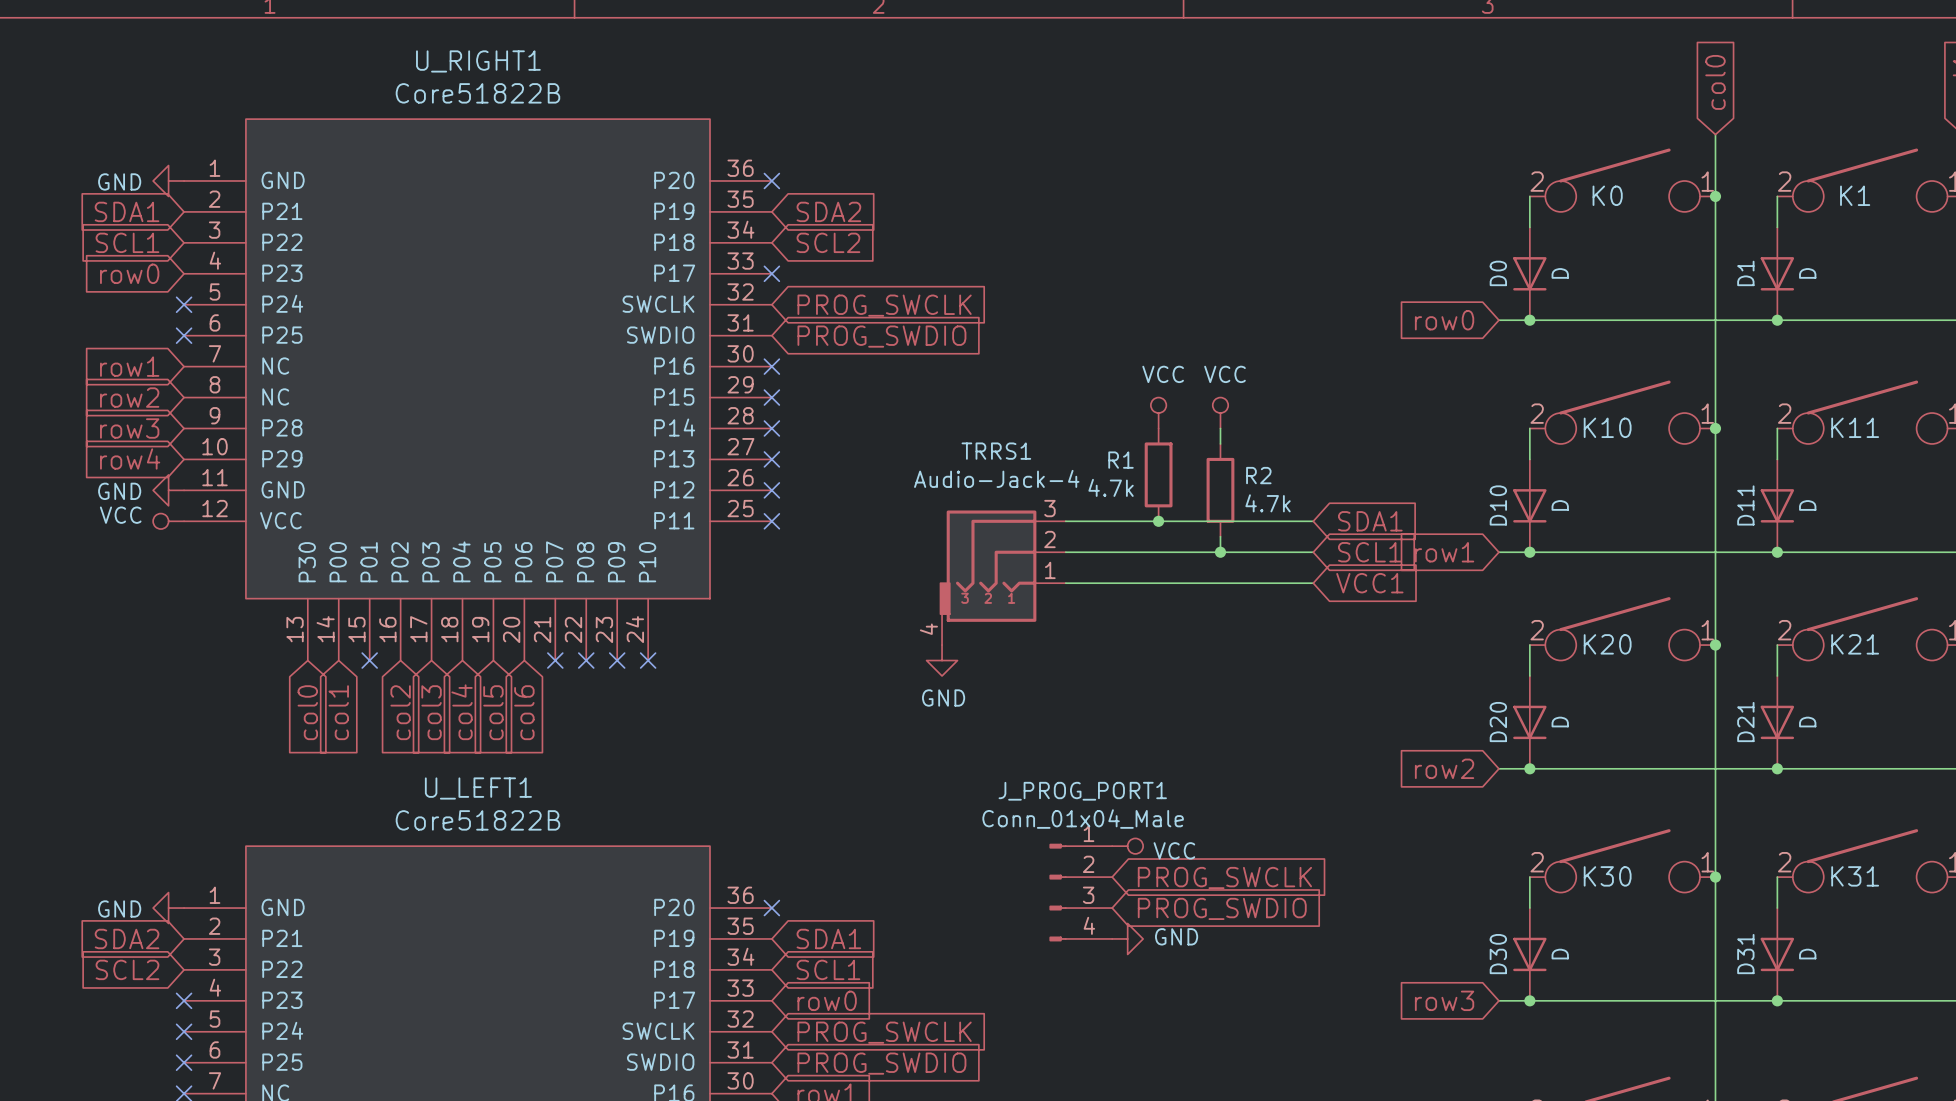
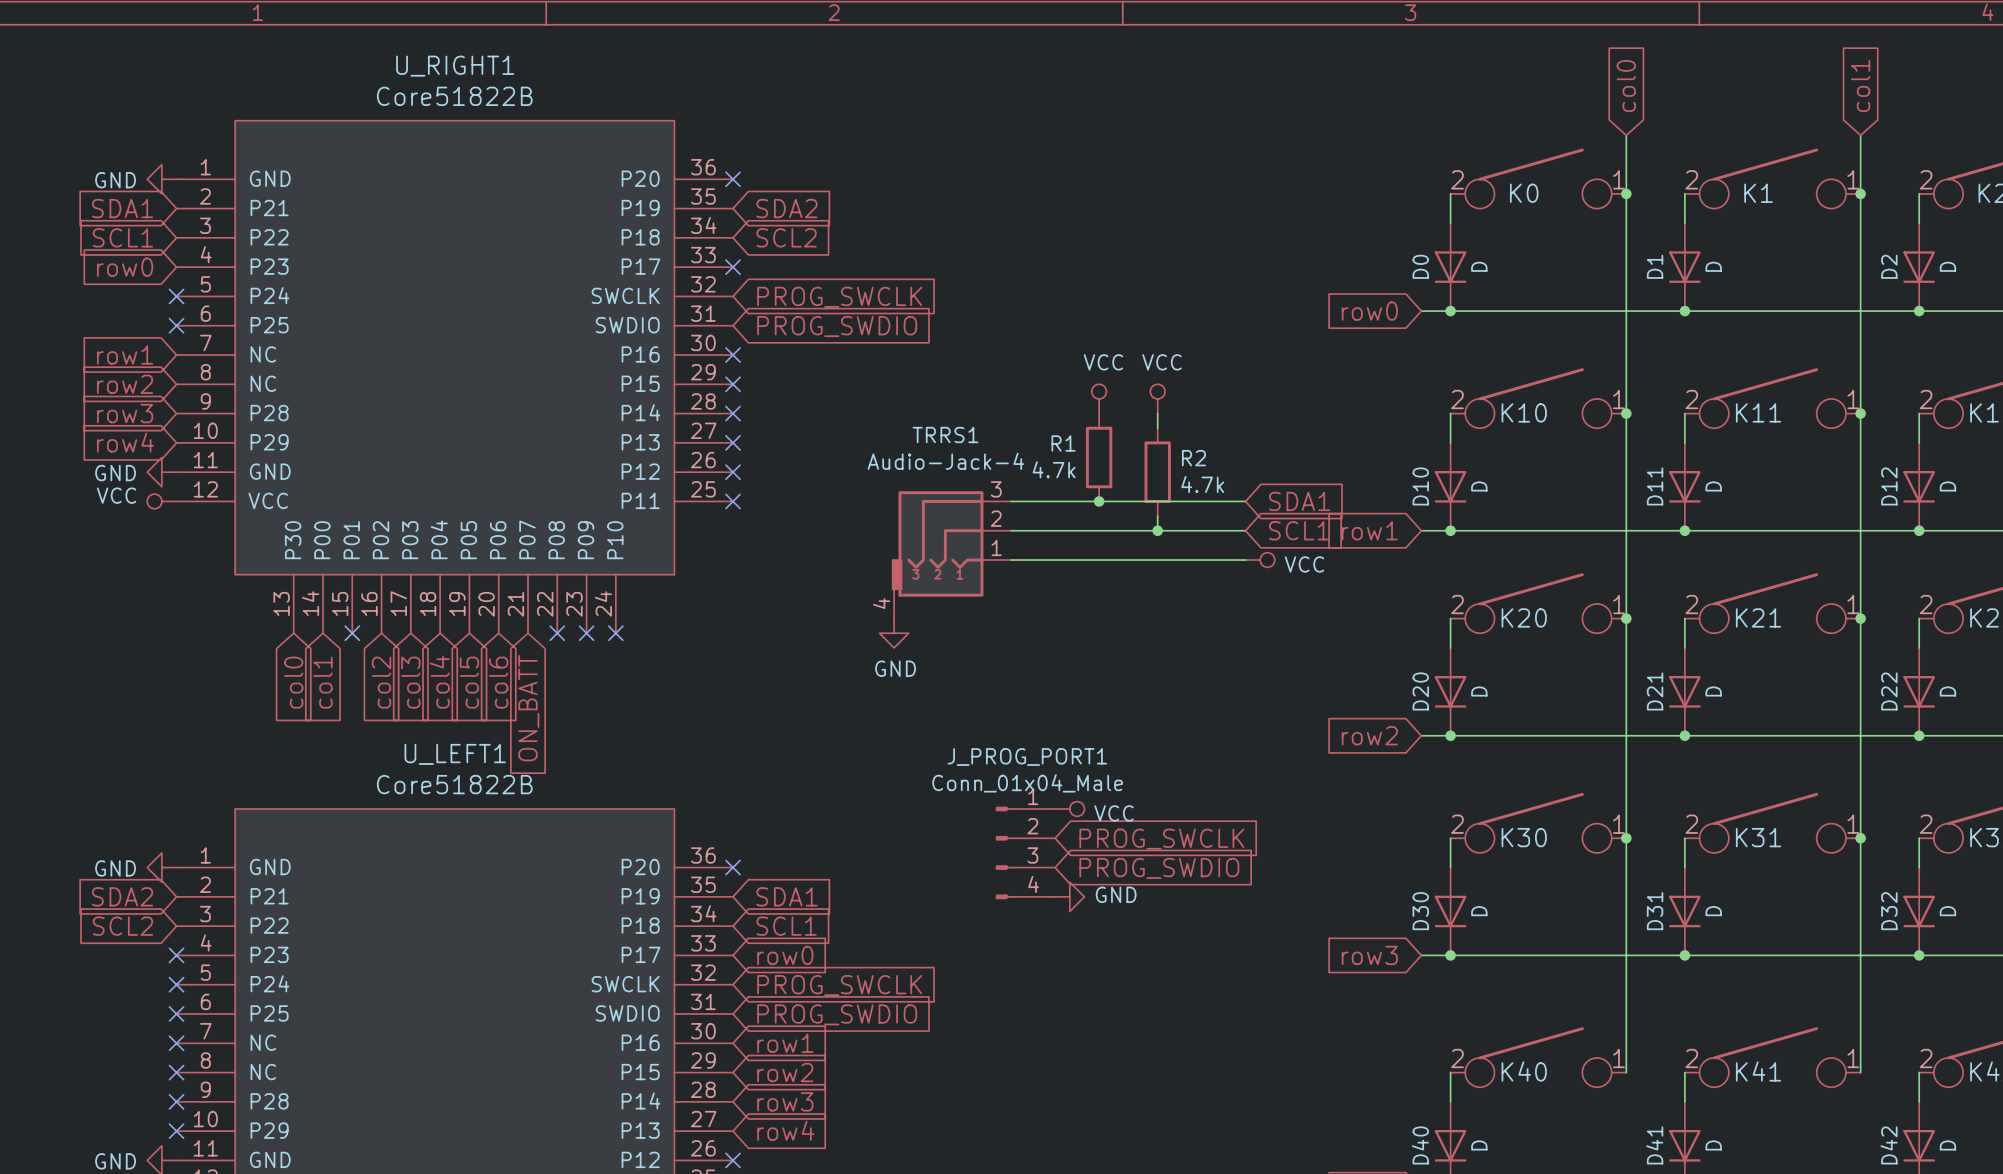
power symbol: none -> VCC (1260, 560)
global label: VCC1 (1369, 583) -> none
no-connect mark: (555, 660) -> none
global label: none -> ON_BATT (528, 708)

